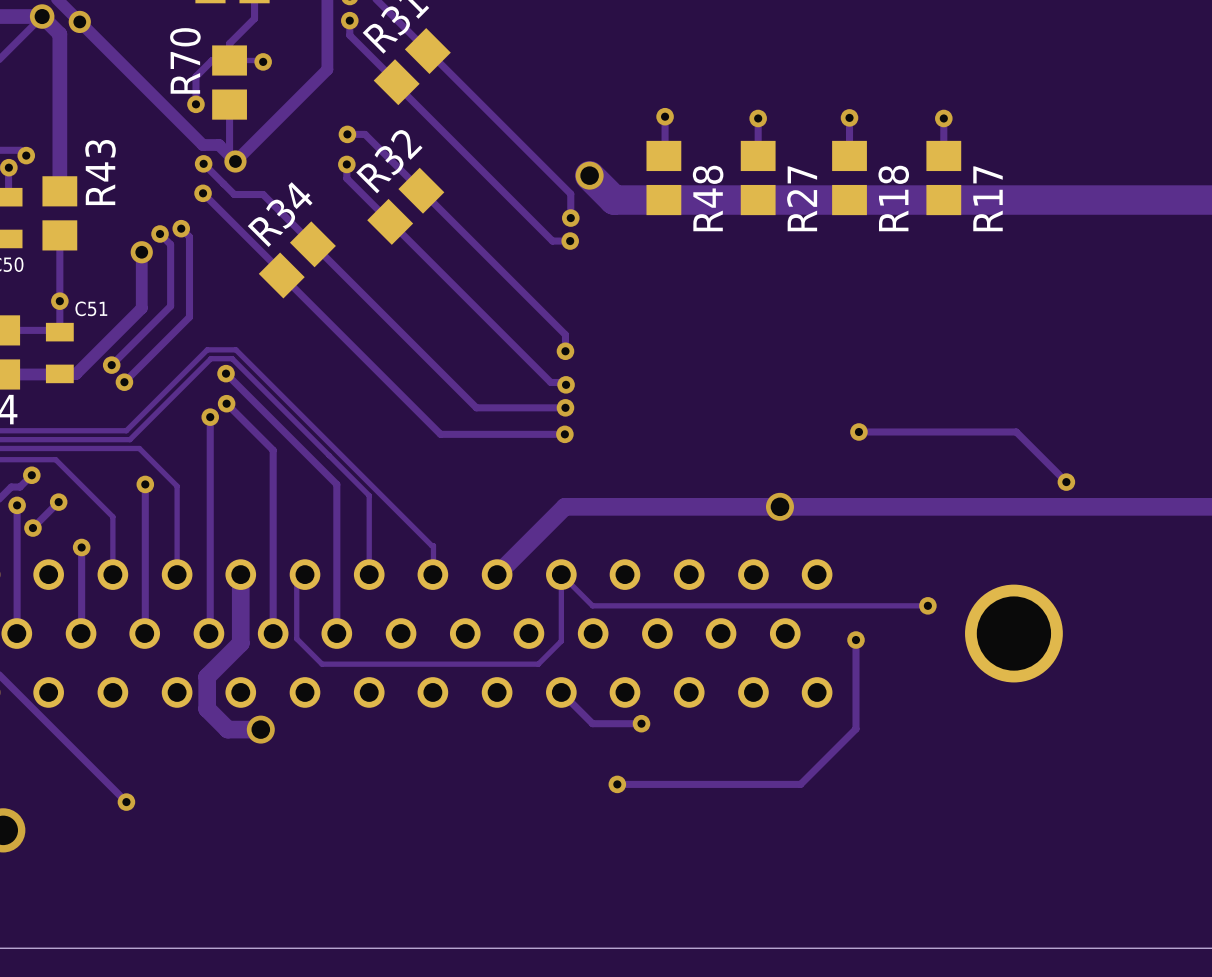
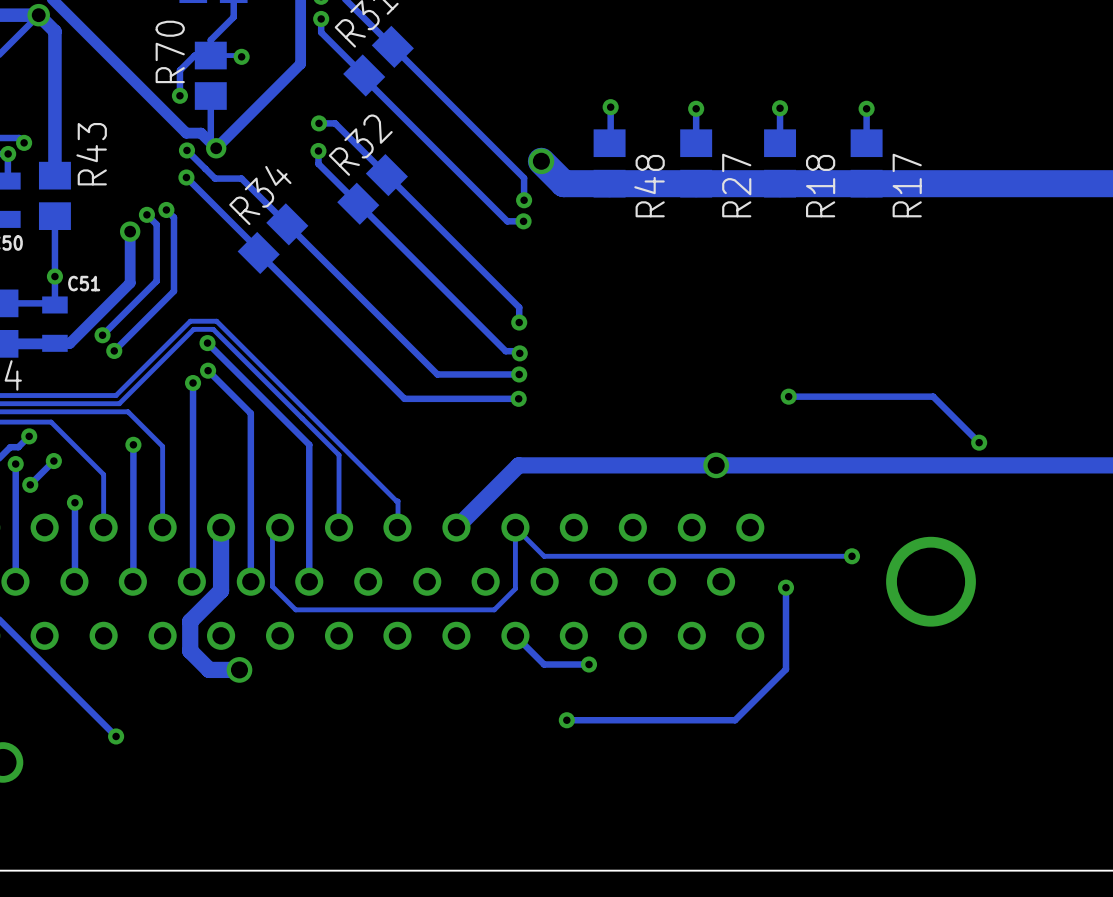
via: (79, 21) -> none

